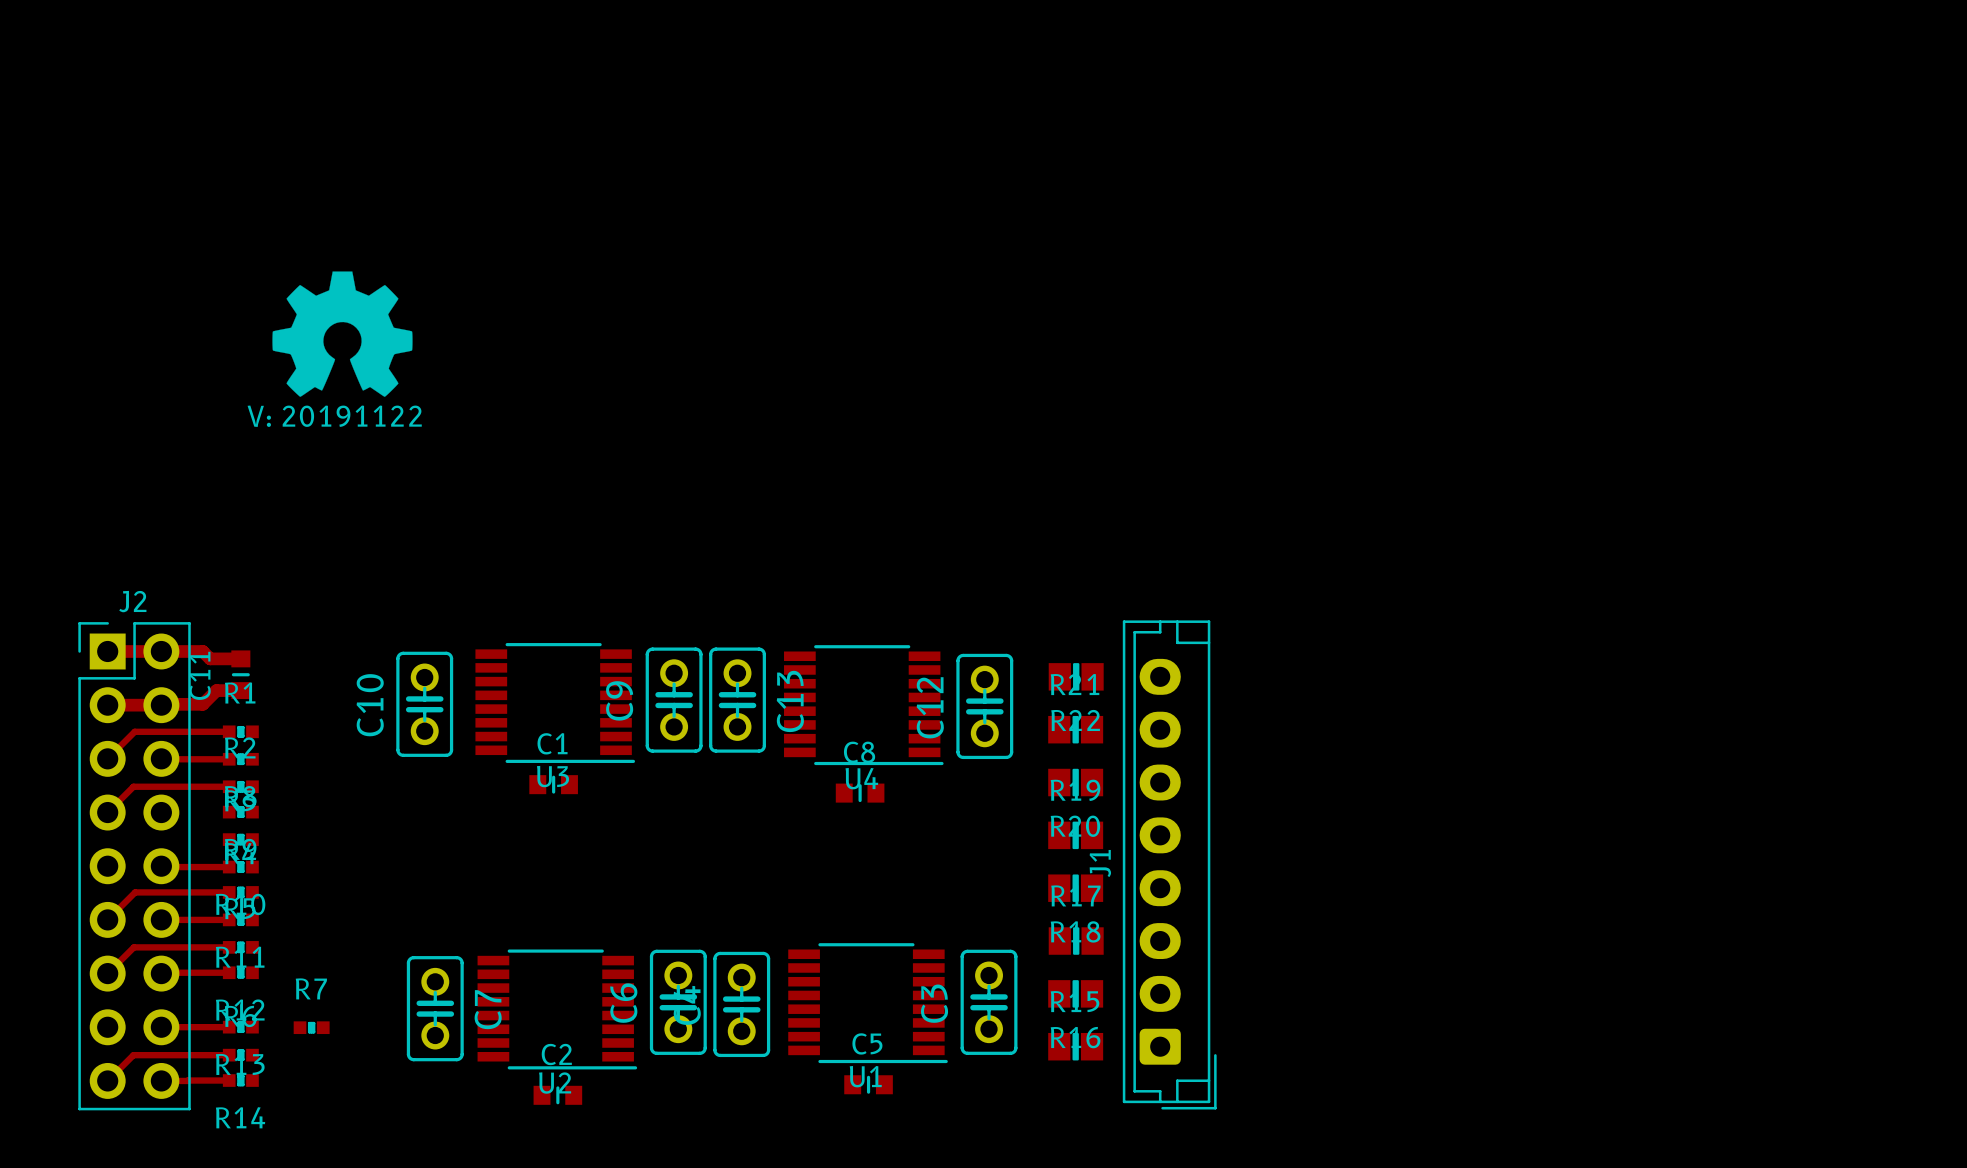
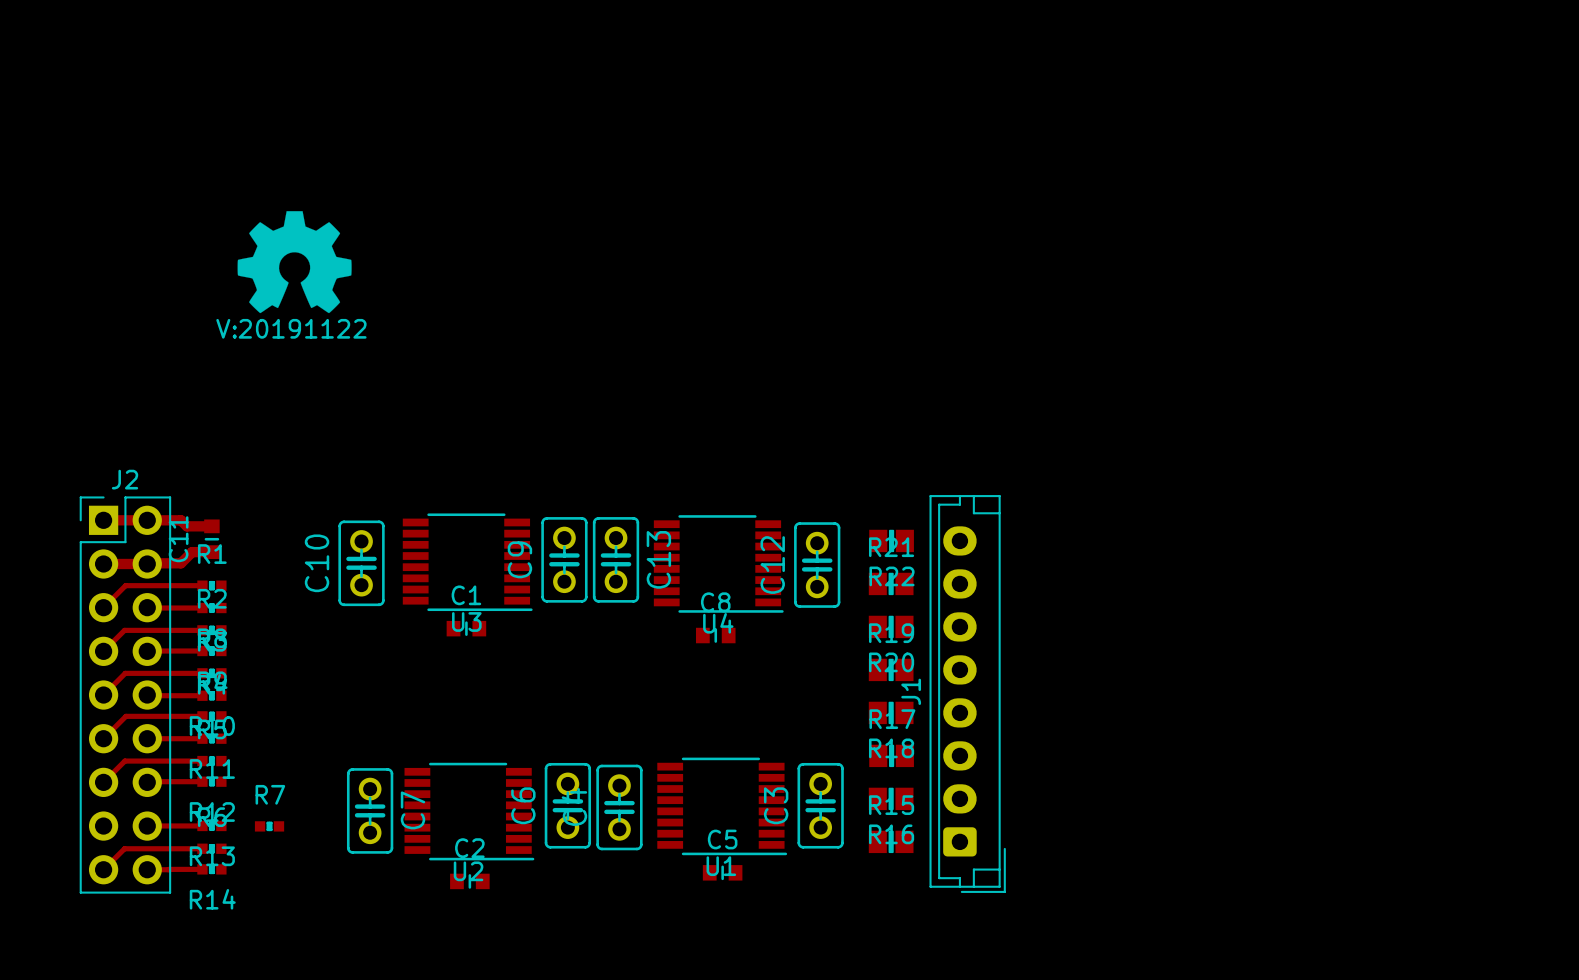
top track: none -> (202, 651) (147, 651)
top track: none -> (202, 673) (125, 673) (103, 695)

